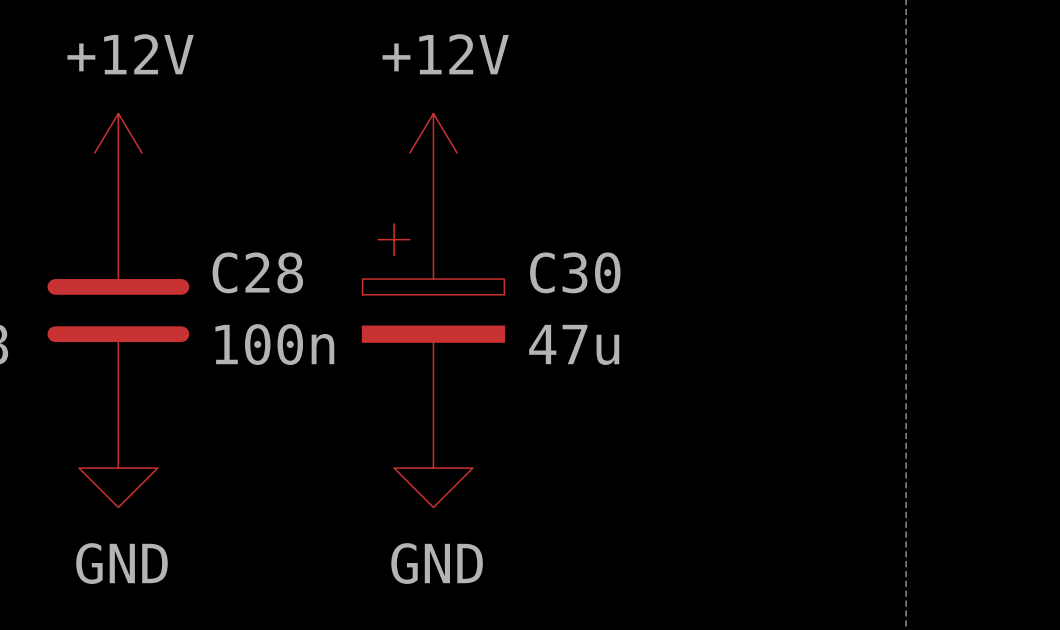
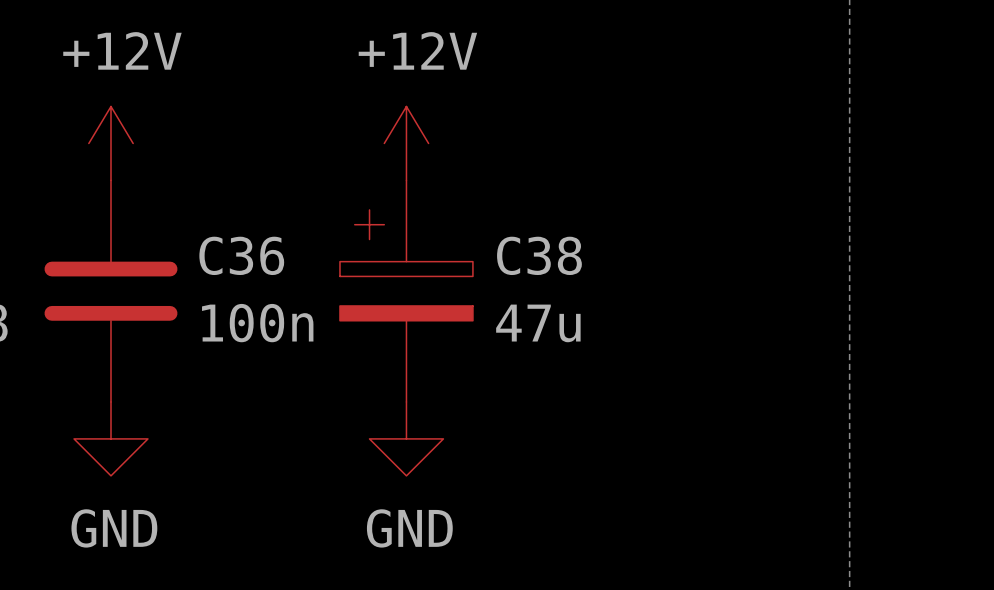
C28 name: C28 (257, 272) -> C36 (241, 255)
C30 name: C30 (575, 272) -> C38 (539, 255)

